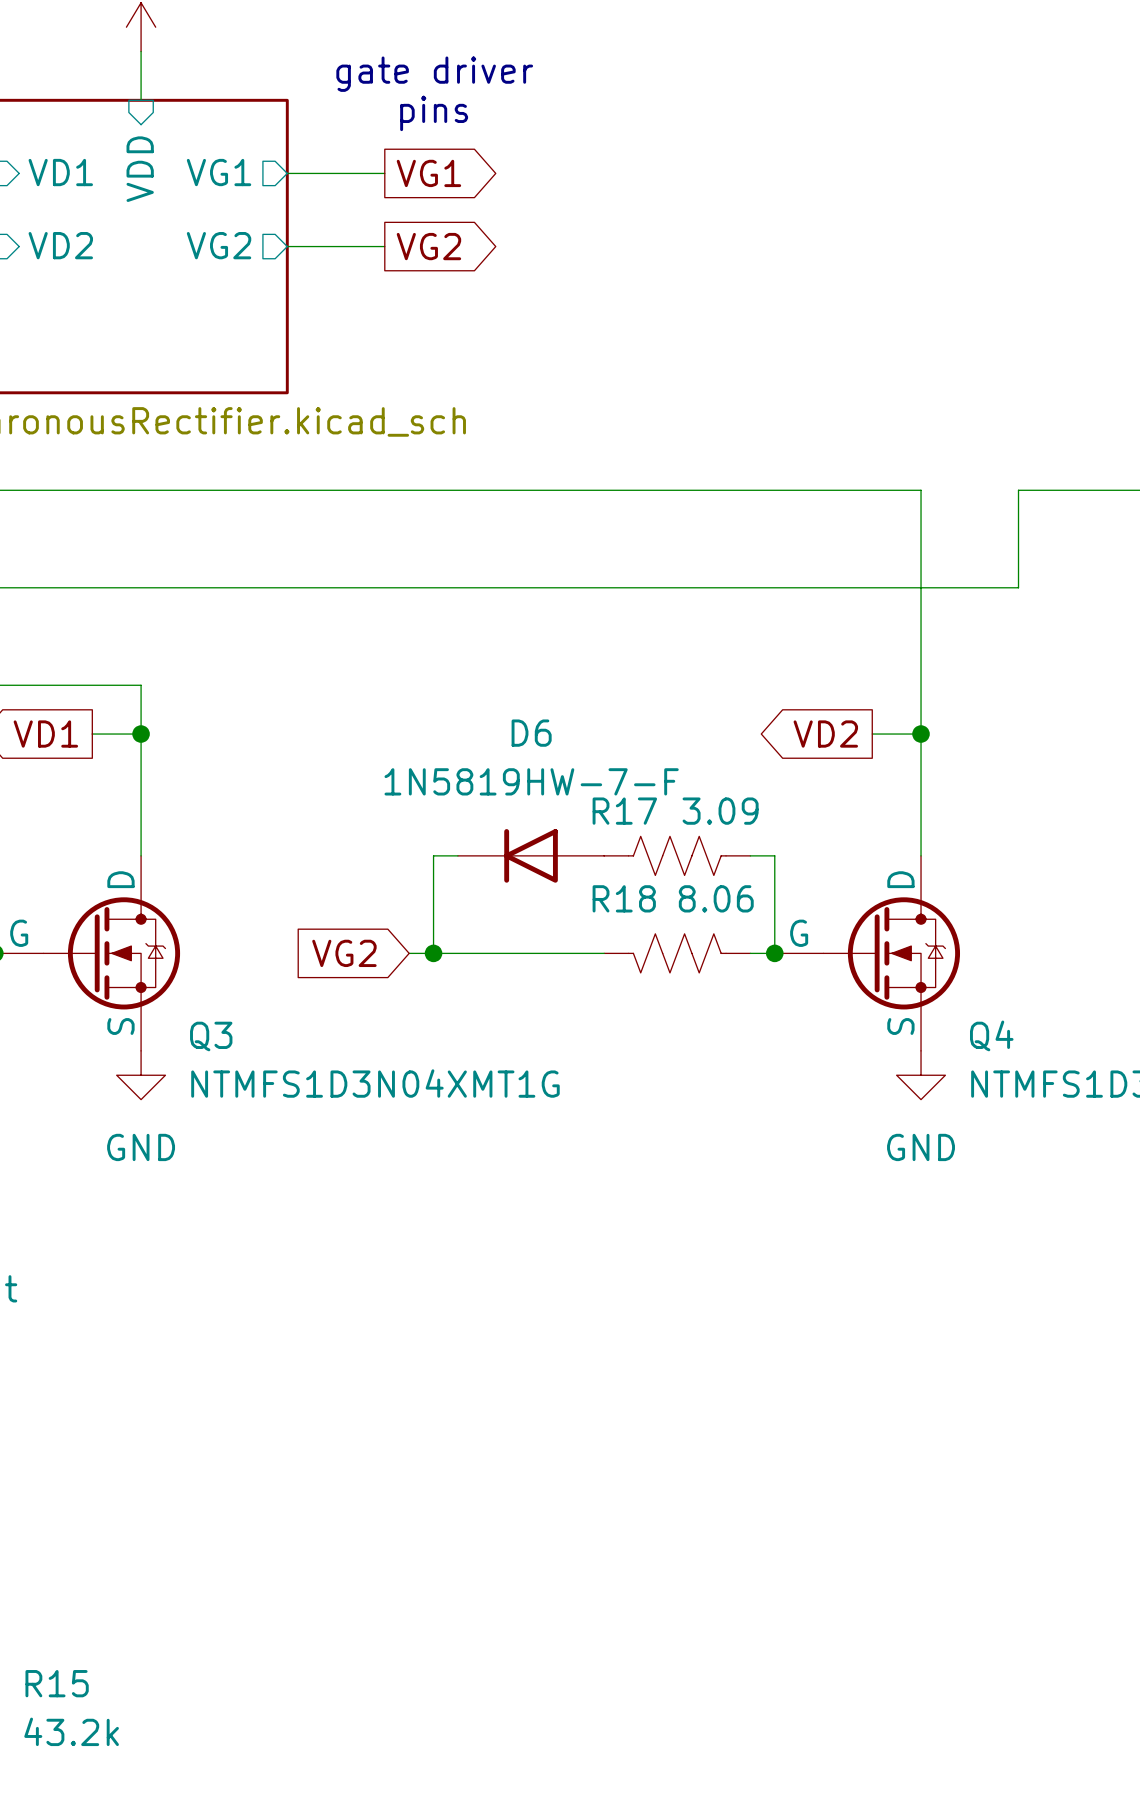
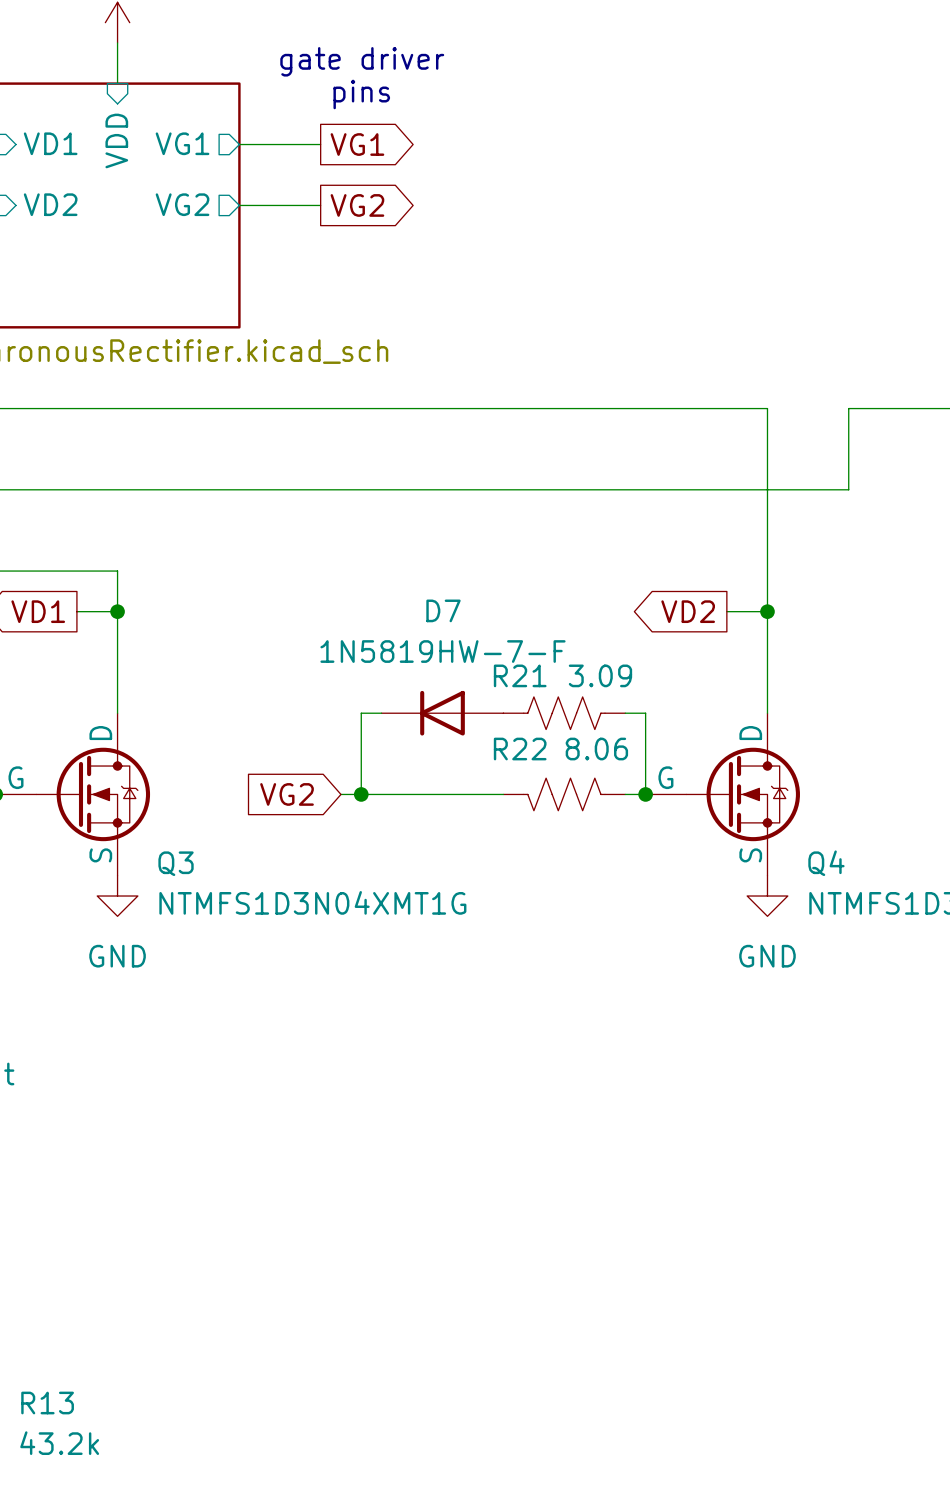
D6 name: D6 (531, 733) -> D7 (443, 610)
R17 name: R17 (624, 811) -> R21 (520, 675)
R18 name: R18 (624, 898) -> R22 (520, 749)
R15 name: R15 (57, 1683) -> R13 (47, 1403)

